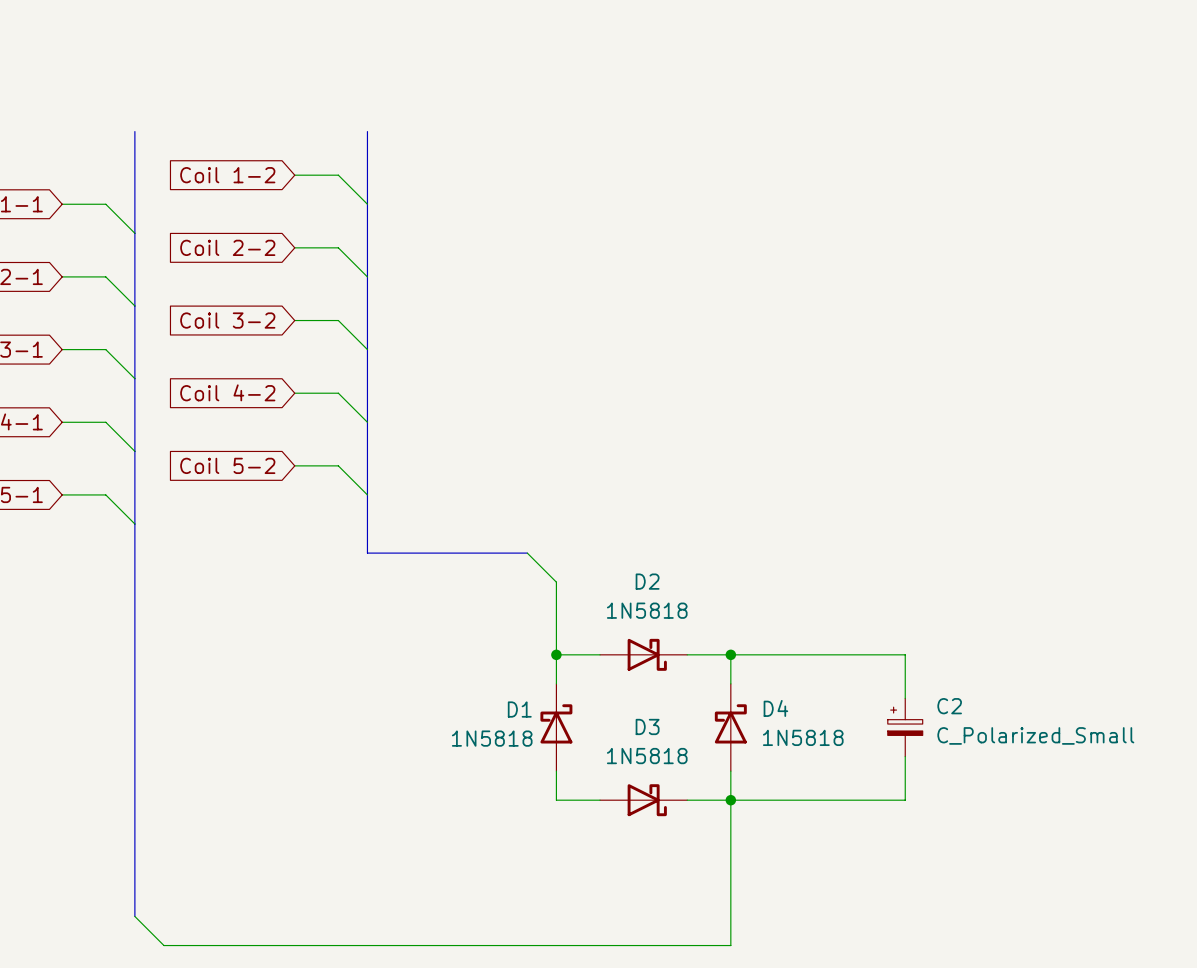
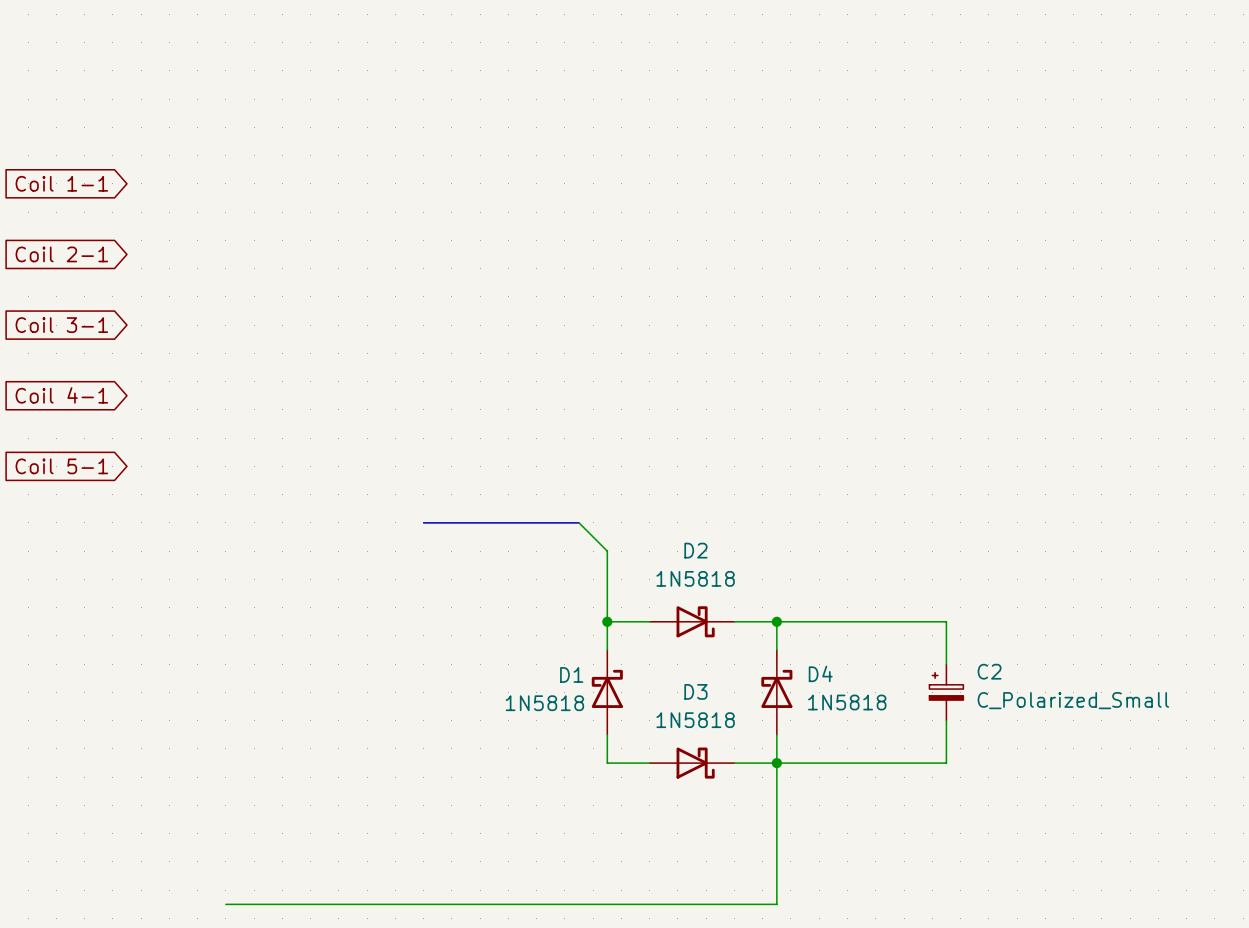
bus: (134, 131) (134, 916) -> none
bus: (367, 131) (367, 553) -> none
global label: Coil 1-2 (227, 175) -> none
wire: (294, 175) (338, 175) (367, 204) -> none
wire: (62, 204) (105, 204) (134, 233) -> none
global label: Coil 2-2 (227, 247) -> none
wire: (294, 247) (338, 247) (367, 276) -> none
wire: (62, 276) (105, 276) (134, 306) -> none
global label: Coil 3-2 (227, 320) -> none
wire: (294, 320) (338, 320) (367, 349) -> none
wire: (62, 349) (105, 349) (134, 378) -> none
global label: Coil 4-2 (227, 392) -> none
wire: (294, 393) (338, 393) (367, 422) -> none
wire: (62, 422) (105, 422) (134, 451) -> none
global label: Coil 5-2 (227, 465) -> none
wire: (294, 465) (338, 465) (367, 494) -> none
wire: (62, 494) (105, 494) (134, 524) -> none
wire: (134, 916) (163, 945) -> none

